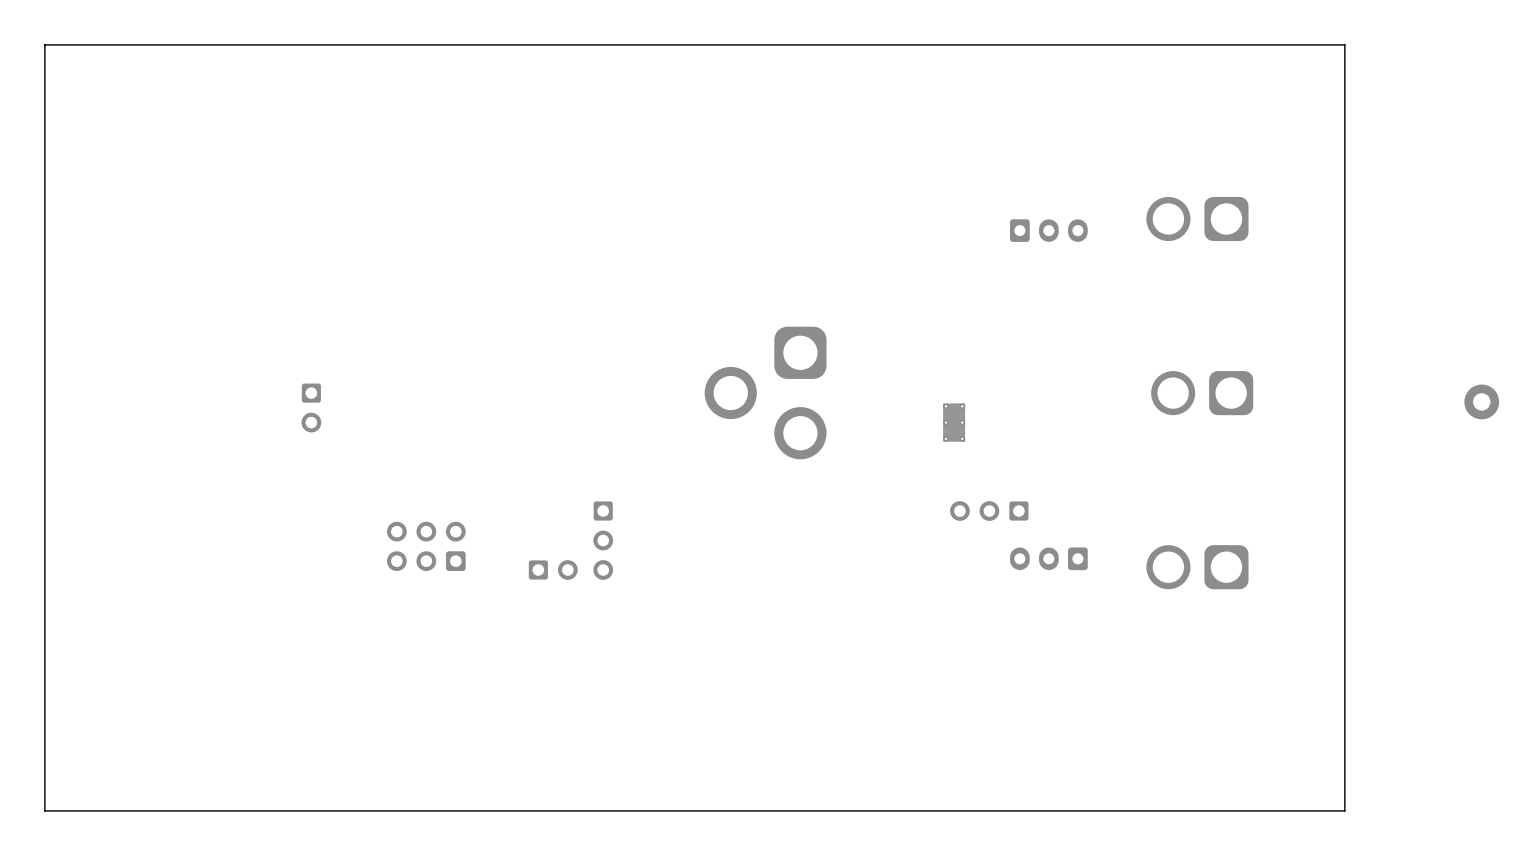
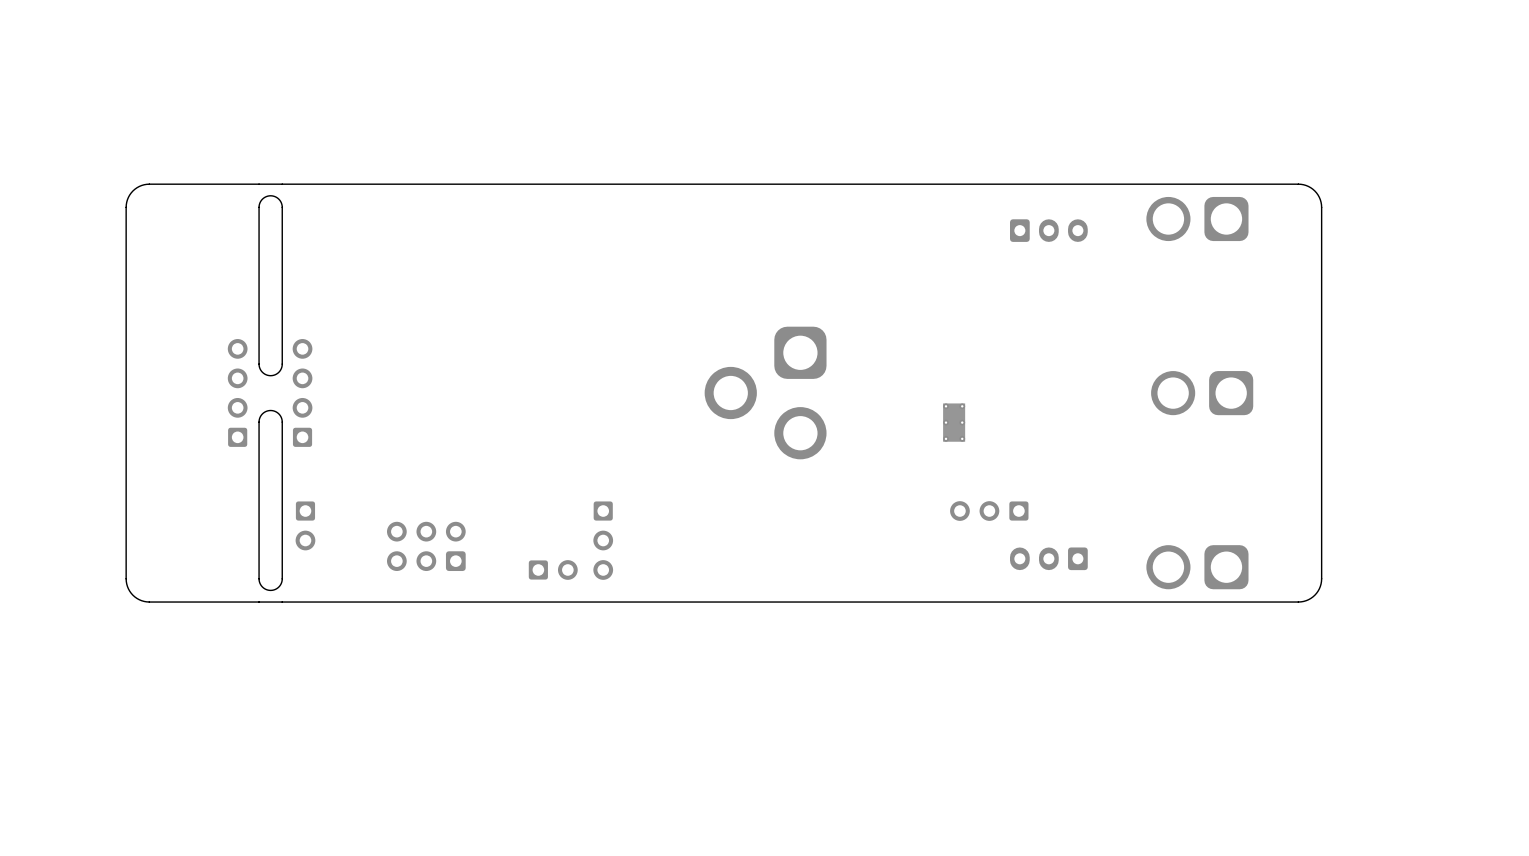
board edge: (1344, 44) (1344, 810) (44, 810) (44, 44) (1344, 44) -> (1298, 184) (1306, 185) (1314, 190) (1320, 199) (1321, 207) (1321, 578) (1316, 593) (1306, 600) (149, 602) (137, 598) (127, 586) (126, 207) (129, 195) (141, 185) (1298, 184)
board edge: none -> (282, 207) (282, 365) (277, 373) (269, 375) (262, 372) (259, 364) (259, 205) (263, 198) (272, 195) (279, 200) (282, 207)
part: none -> (237, 392)
part: none -> (302, 392)
part: (1481, 401) -> none
part position: (311, 407) -> (305, 525)
board edge: none -> (282, 422) (282, 580) (277, 588) (269, 590) (262, 587) (259, 578) (259, 420) (263, 412) (272, 410) (279, 415) (282, 422)

